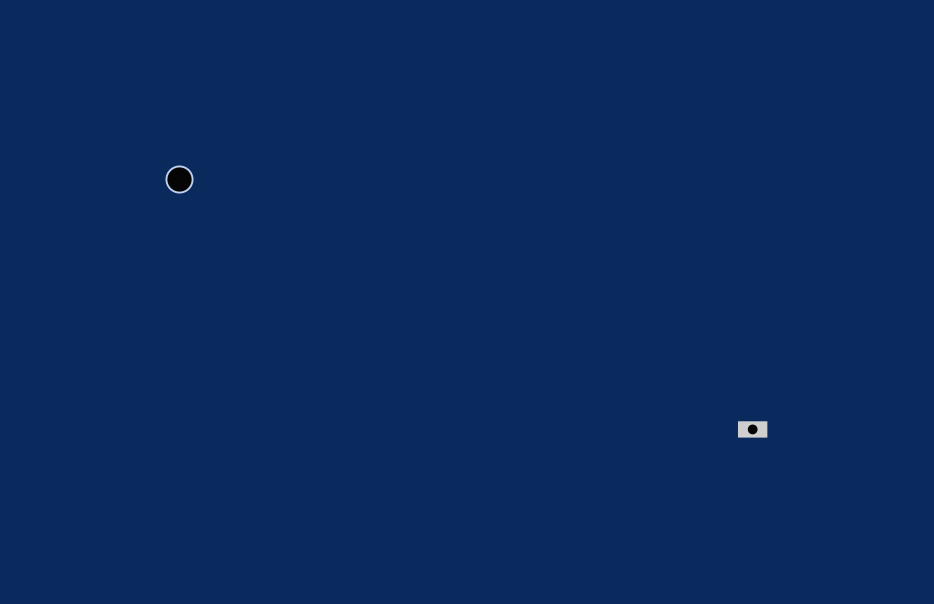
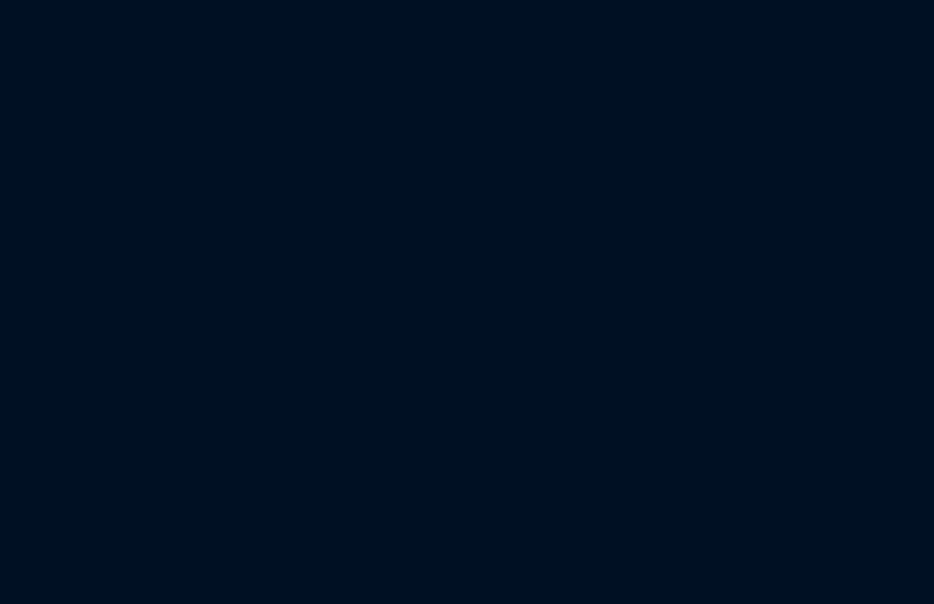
part: (179, 179) -> none
part: (752, 429) -> none

